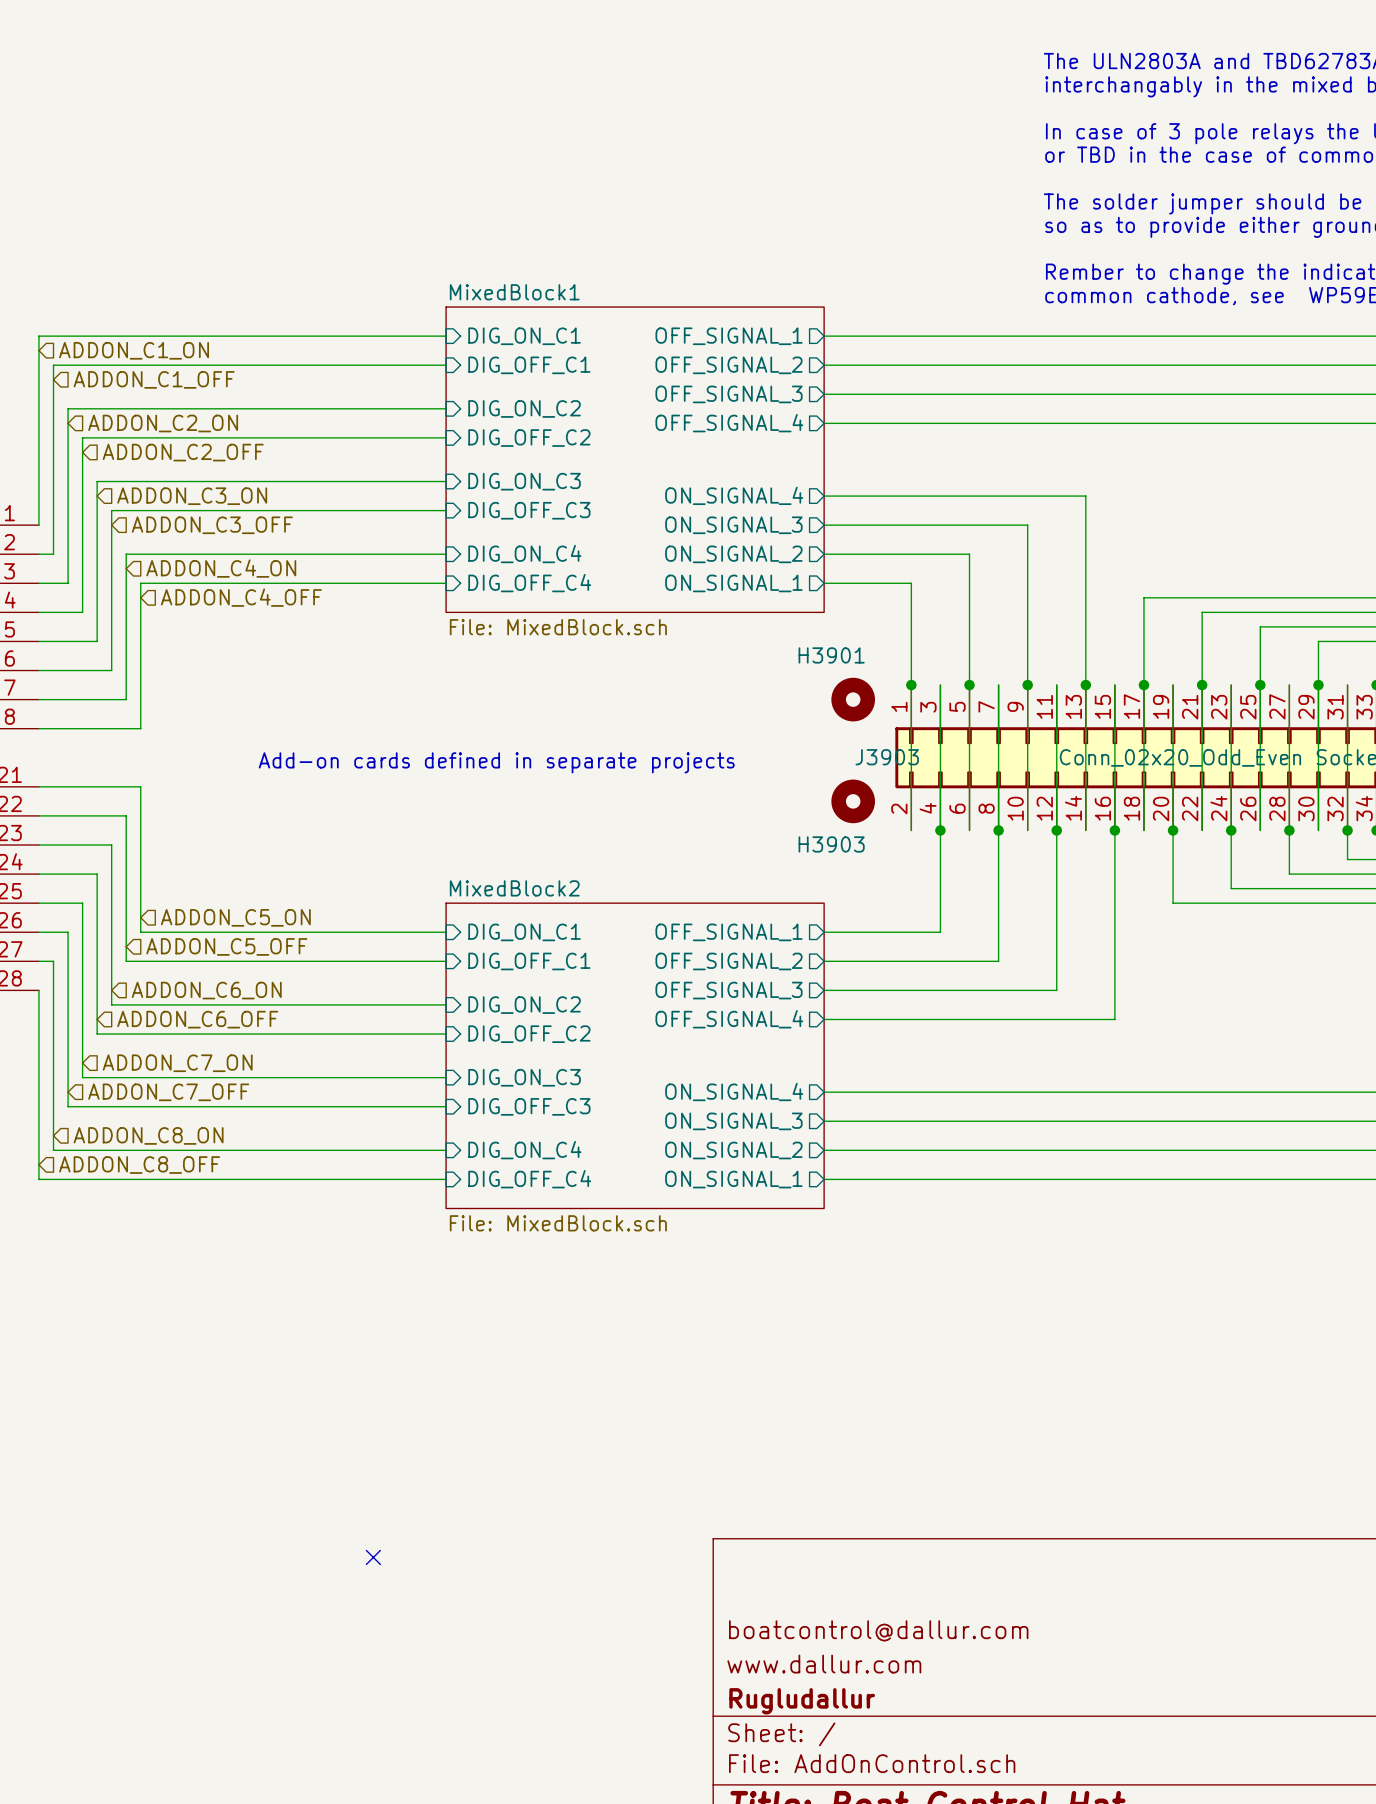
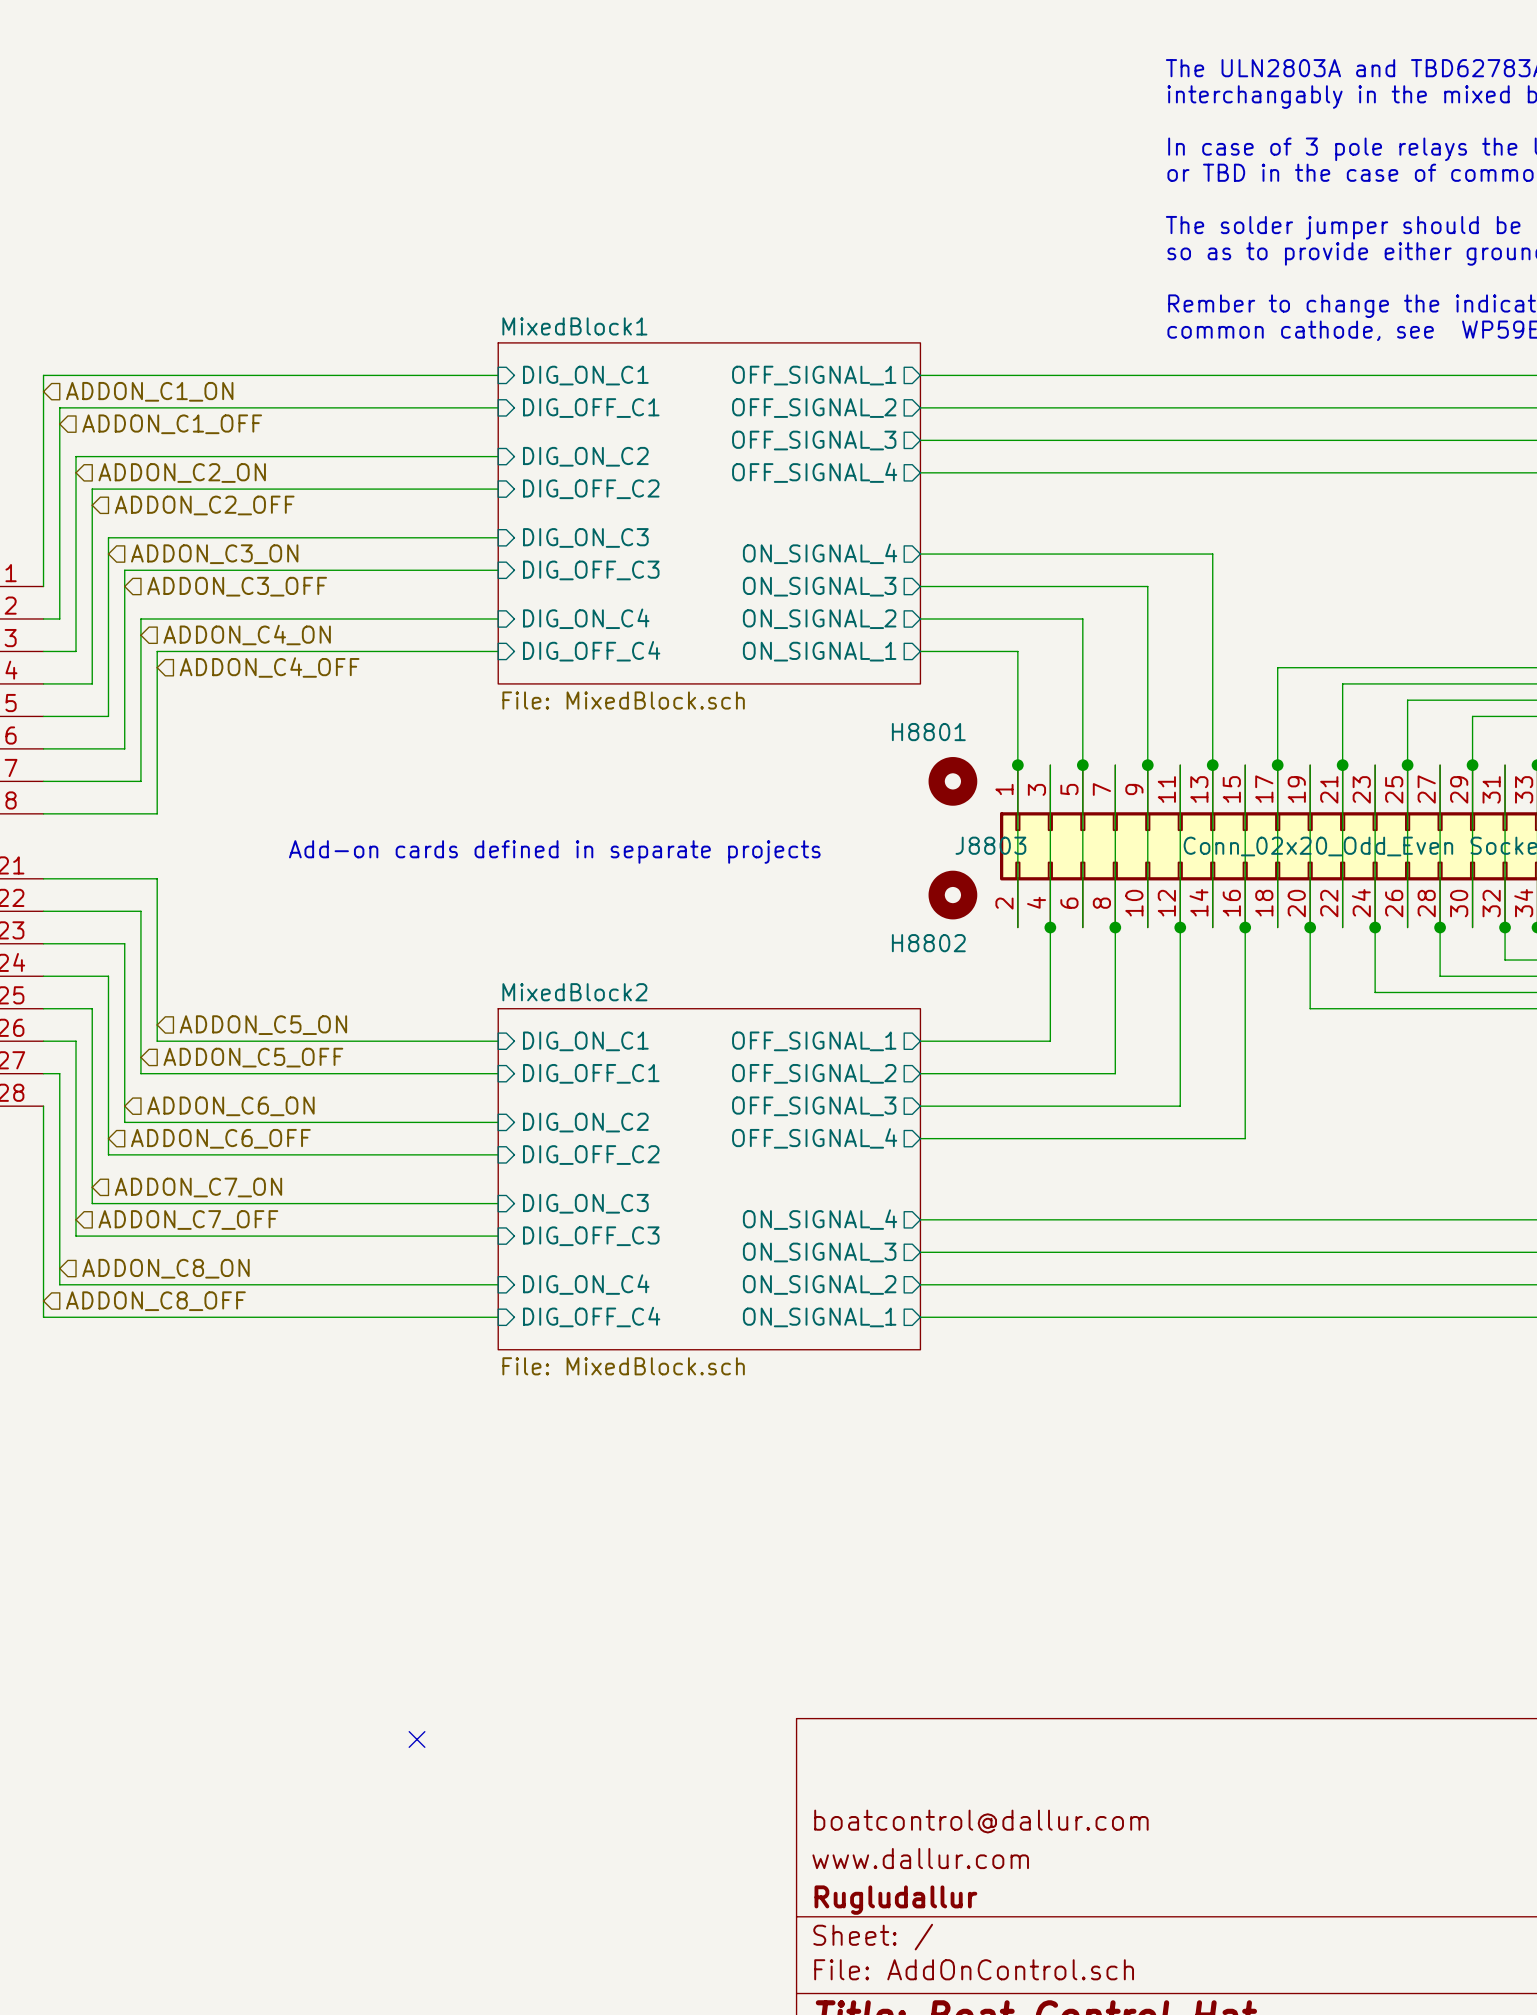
H3901 name: H3901 (831, 655) -> H8801 (928, 732)
J3903 name: J3903 (887, 757) -> J8803 (990, 845)
H3903 name: H3903 (831, 844) -> H8802 (928, 943)

